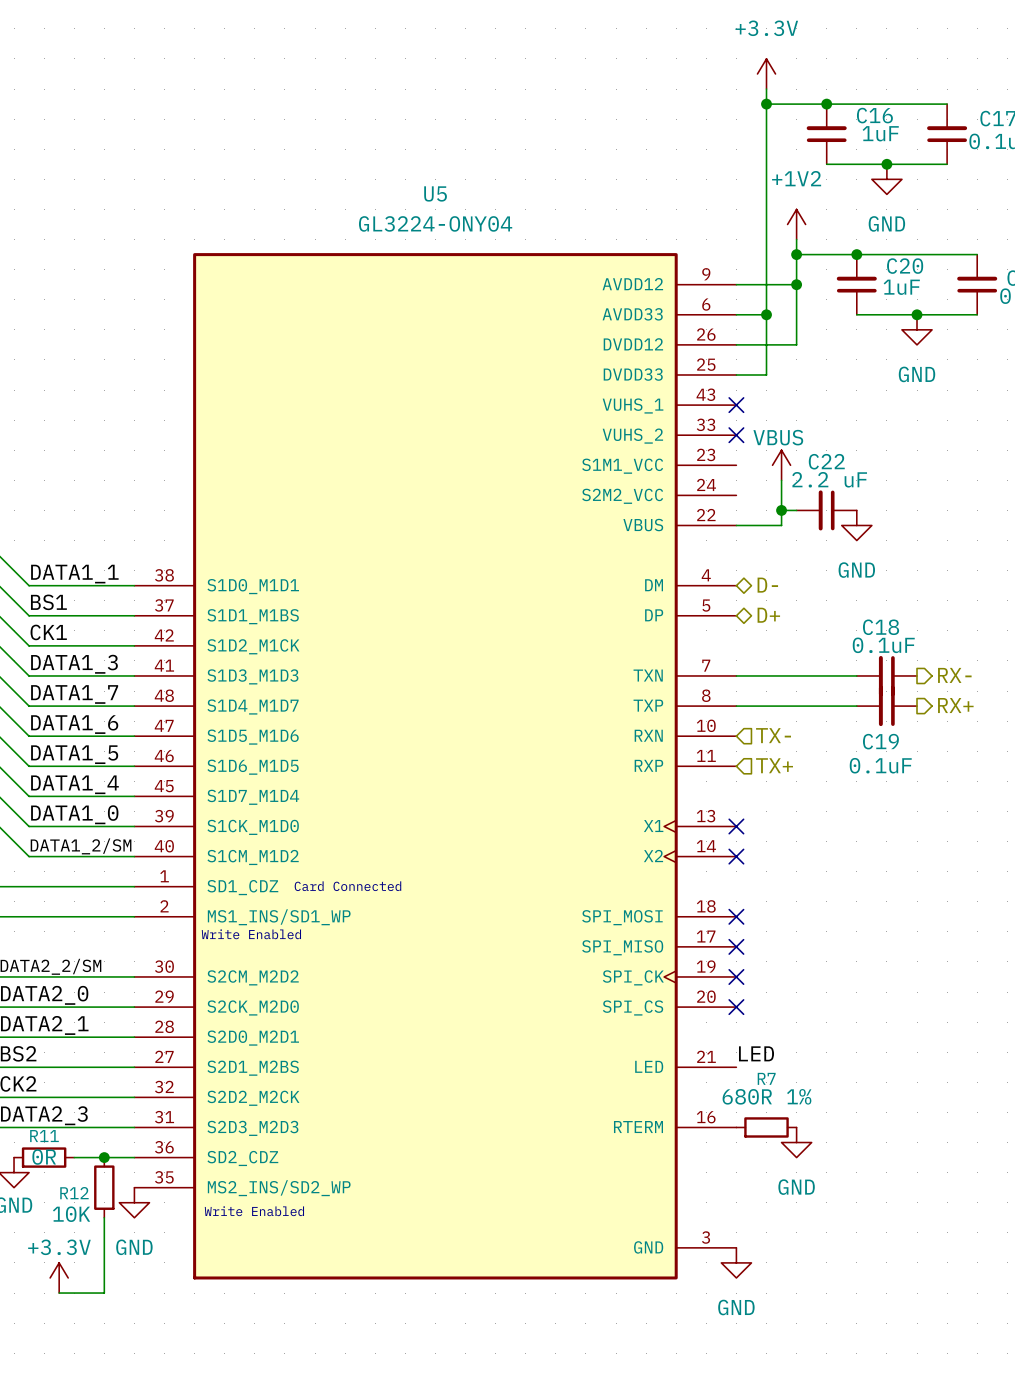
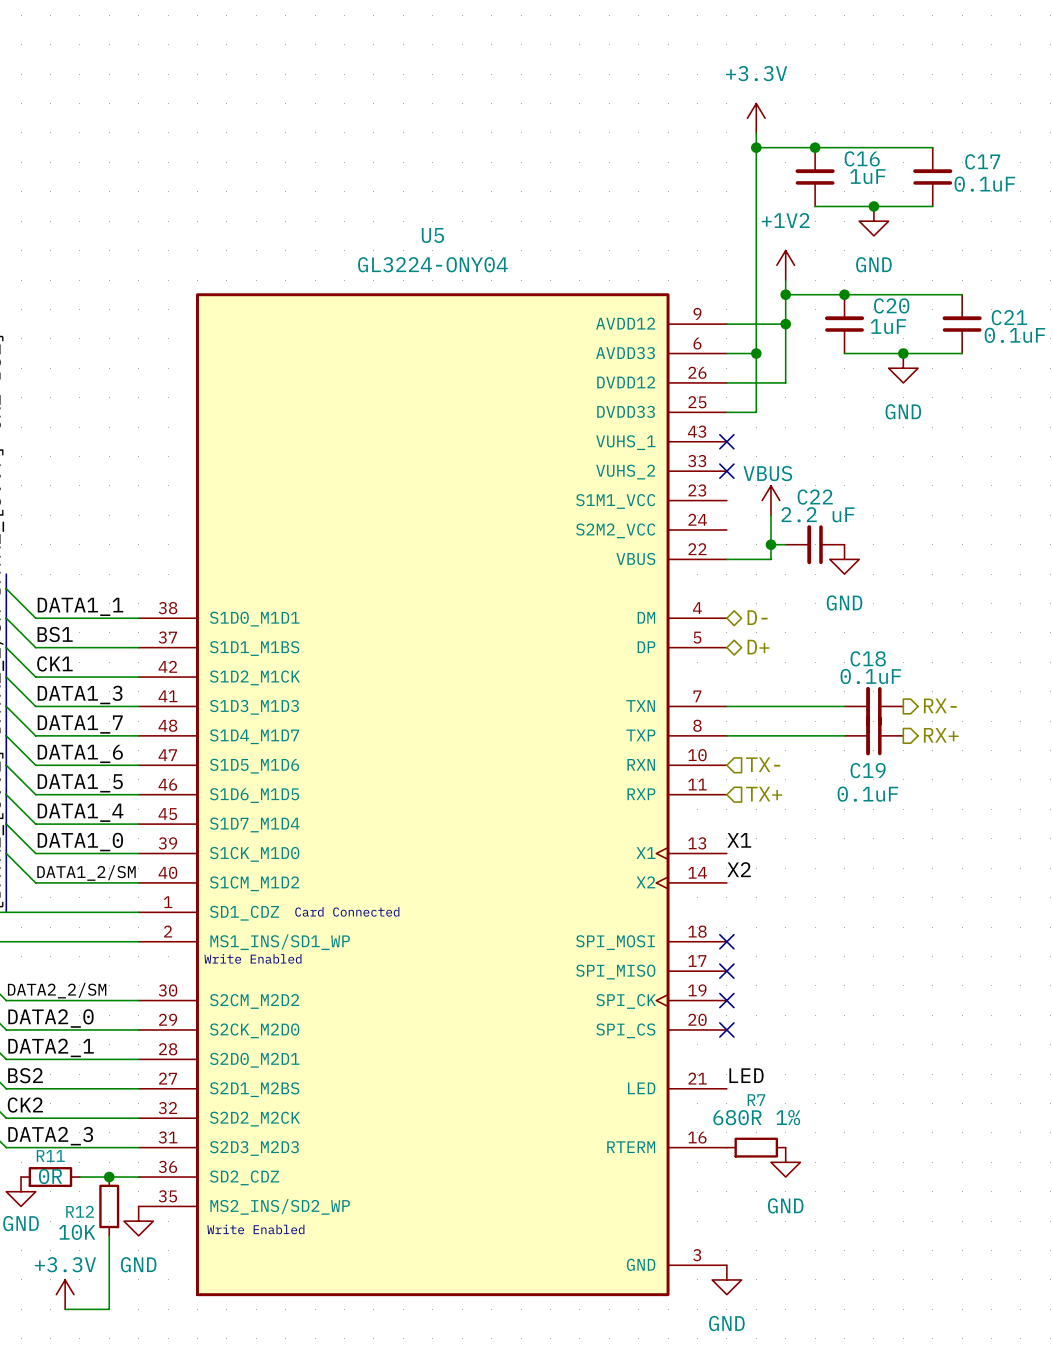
label: none -> X1 (739, 840)
no-connect mark: (736, 826) -> none
label: none -> X2 (739, 869)
no-connect mark: (736, 856) -> none

